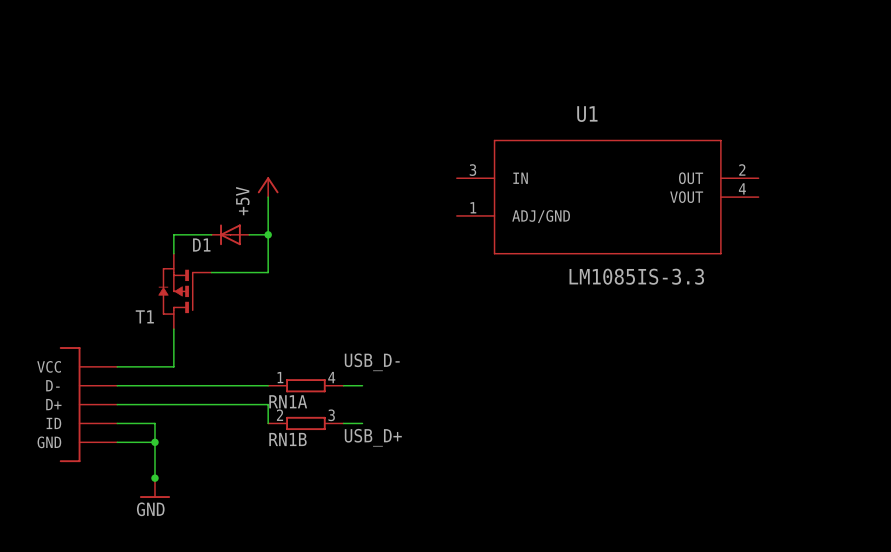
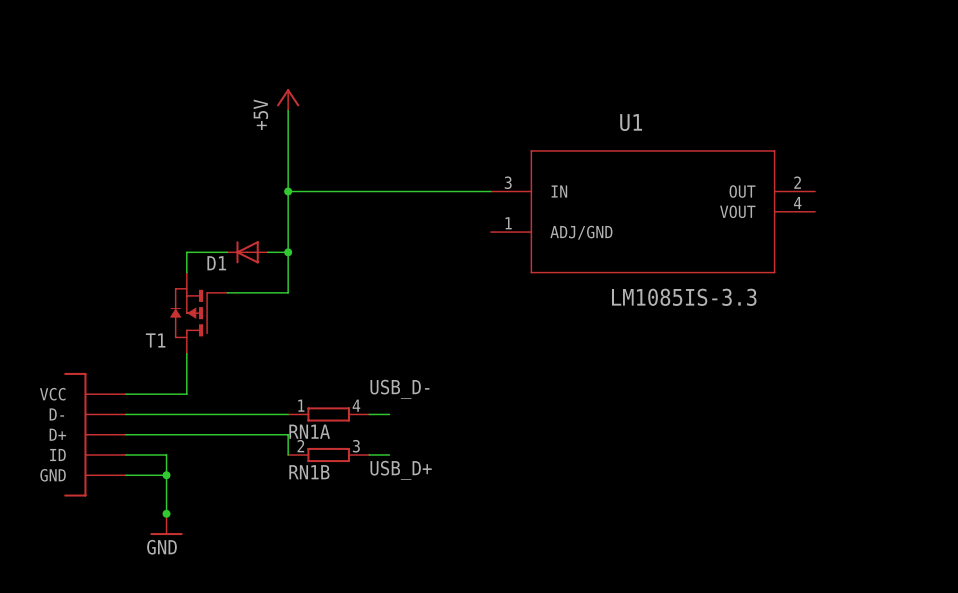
wire: none -> (288, 110) (288, 211)
wire: none -> (288, 191) (490, 191)
junction: none -> (288, 191)
power symbol position: +5V (268, 187) -> +5V (288, 99)

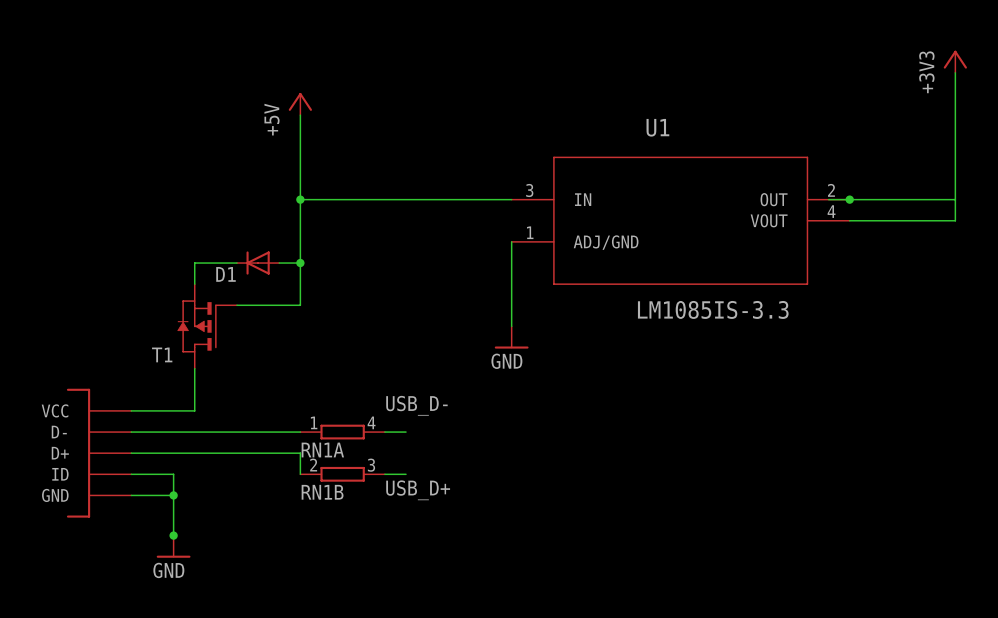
power symbol: none -> +3V3 (955, 61)
wire: none -> (955, 72) (955, 220) (849, 220)
wire: none -> (828, 199) (955, 199)
junction: none -> (849, 199)
wire: none -> (511, 241) (511, 326)
power symbol: none -> GND (511, 337)

